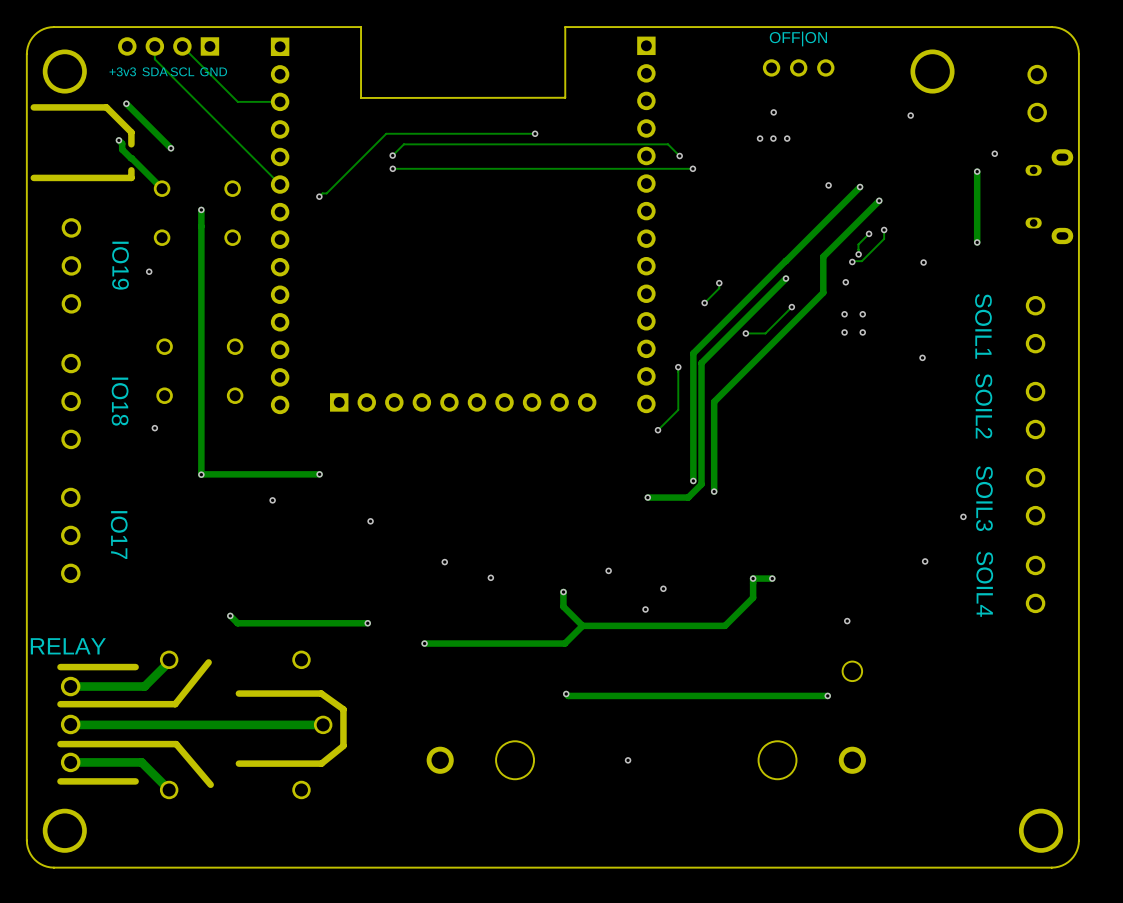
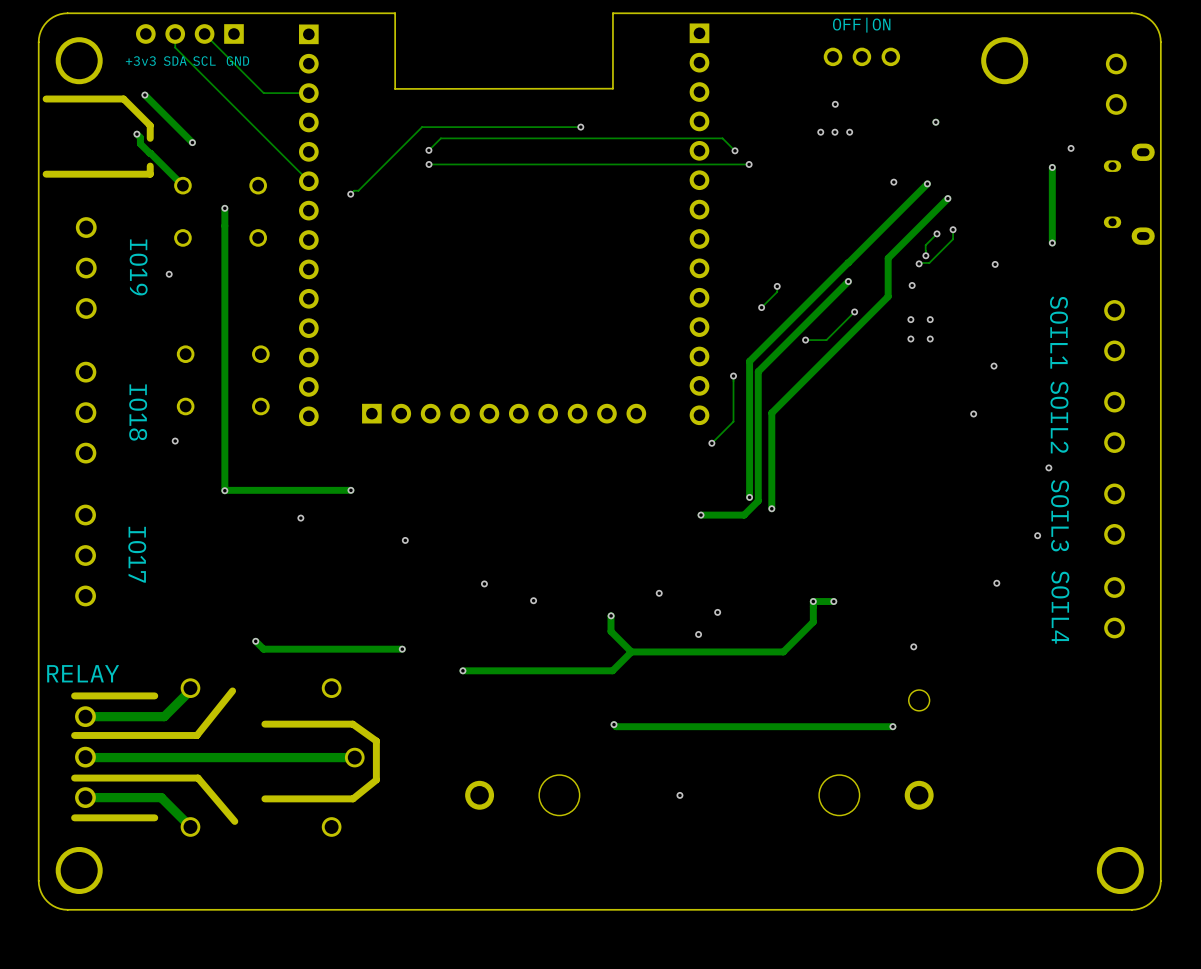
via position: (910, 115) -> (935, 122)
via: none -> (973, 414)
via: none -> (1048, 467)

